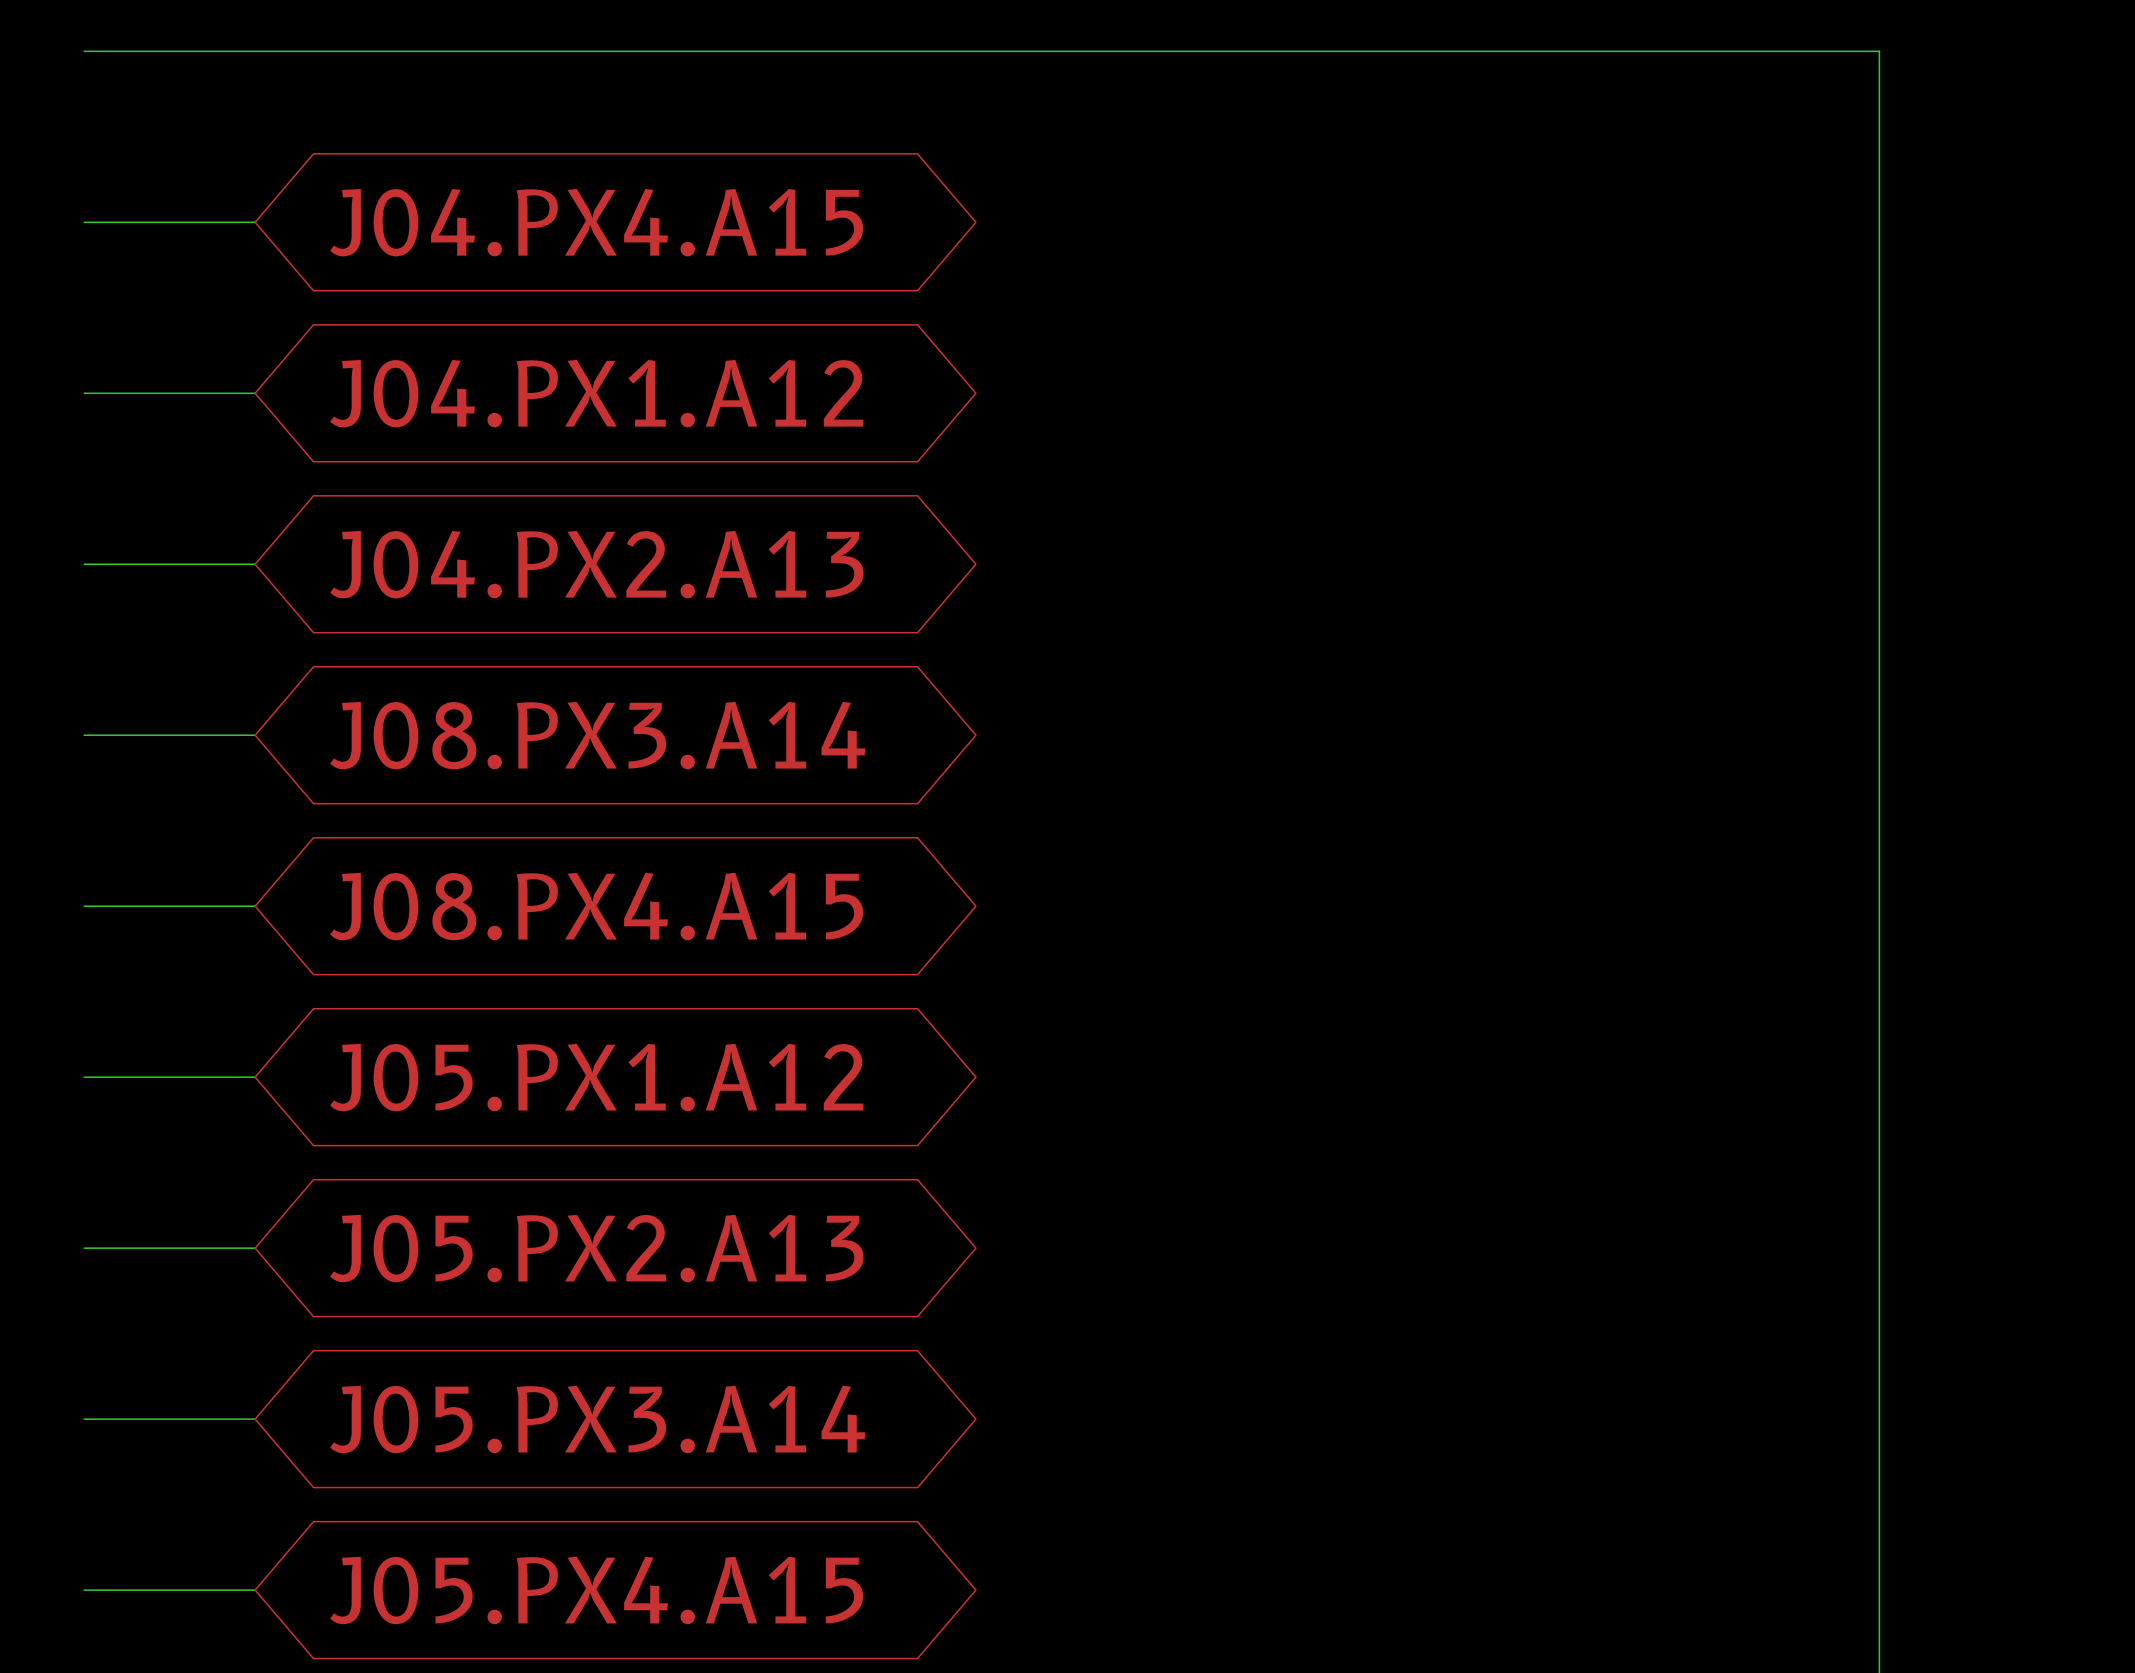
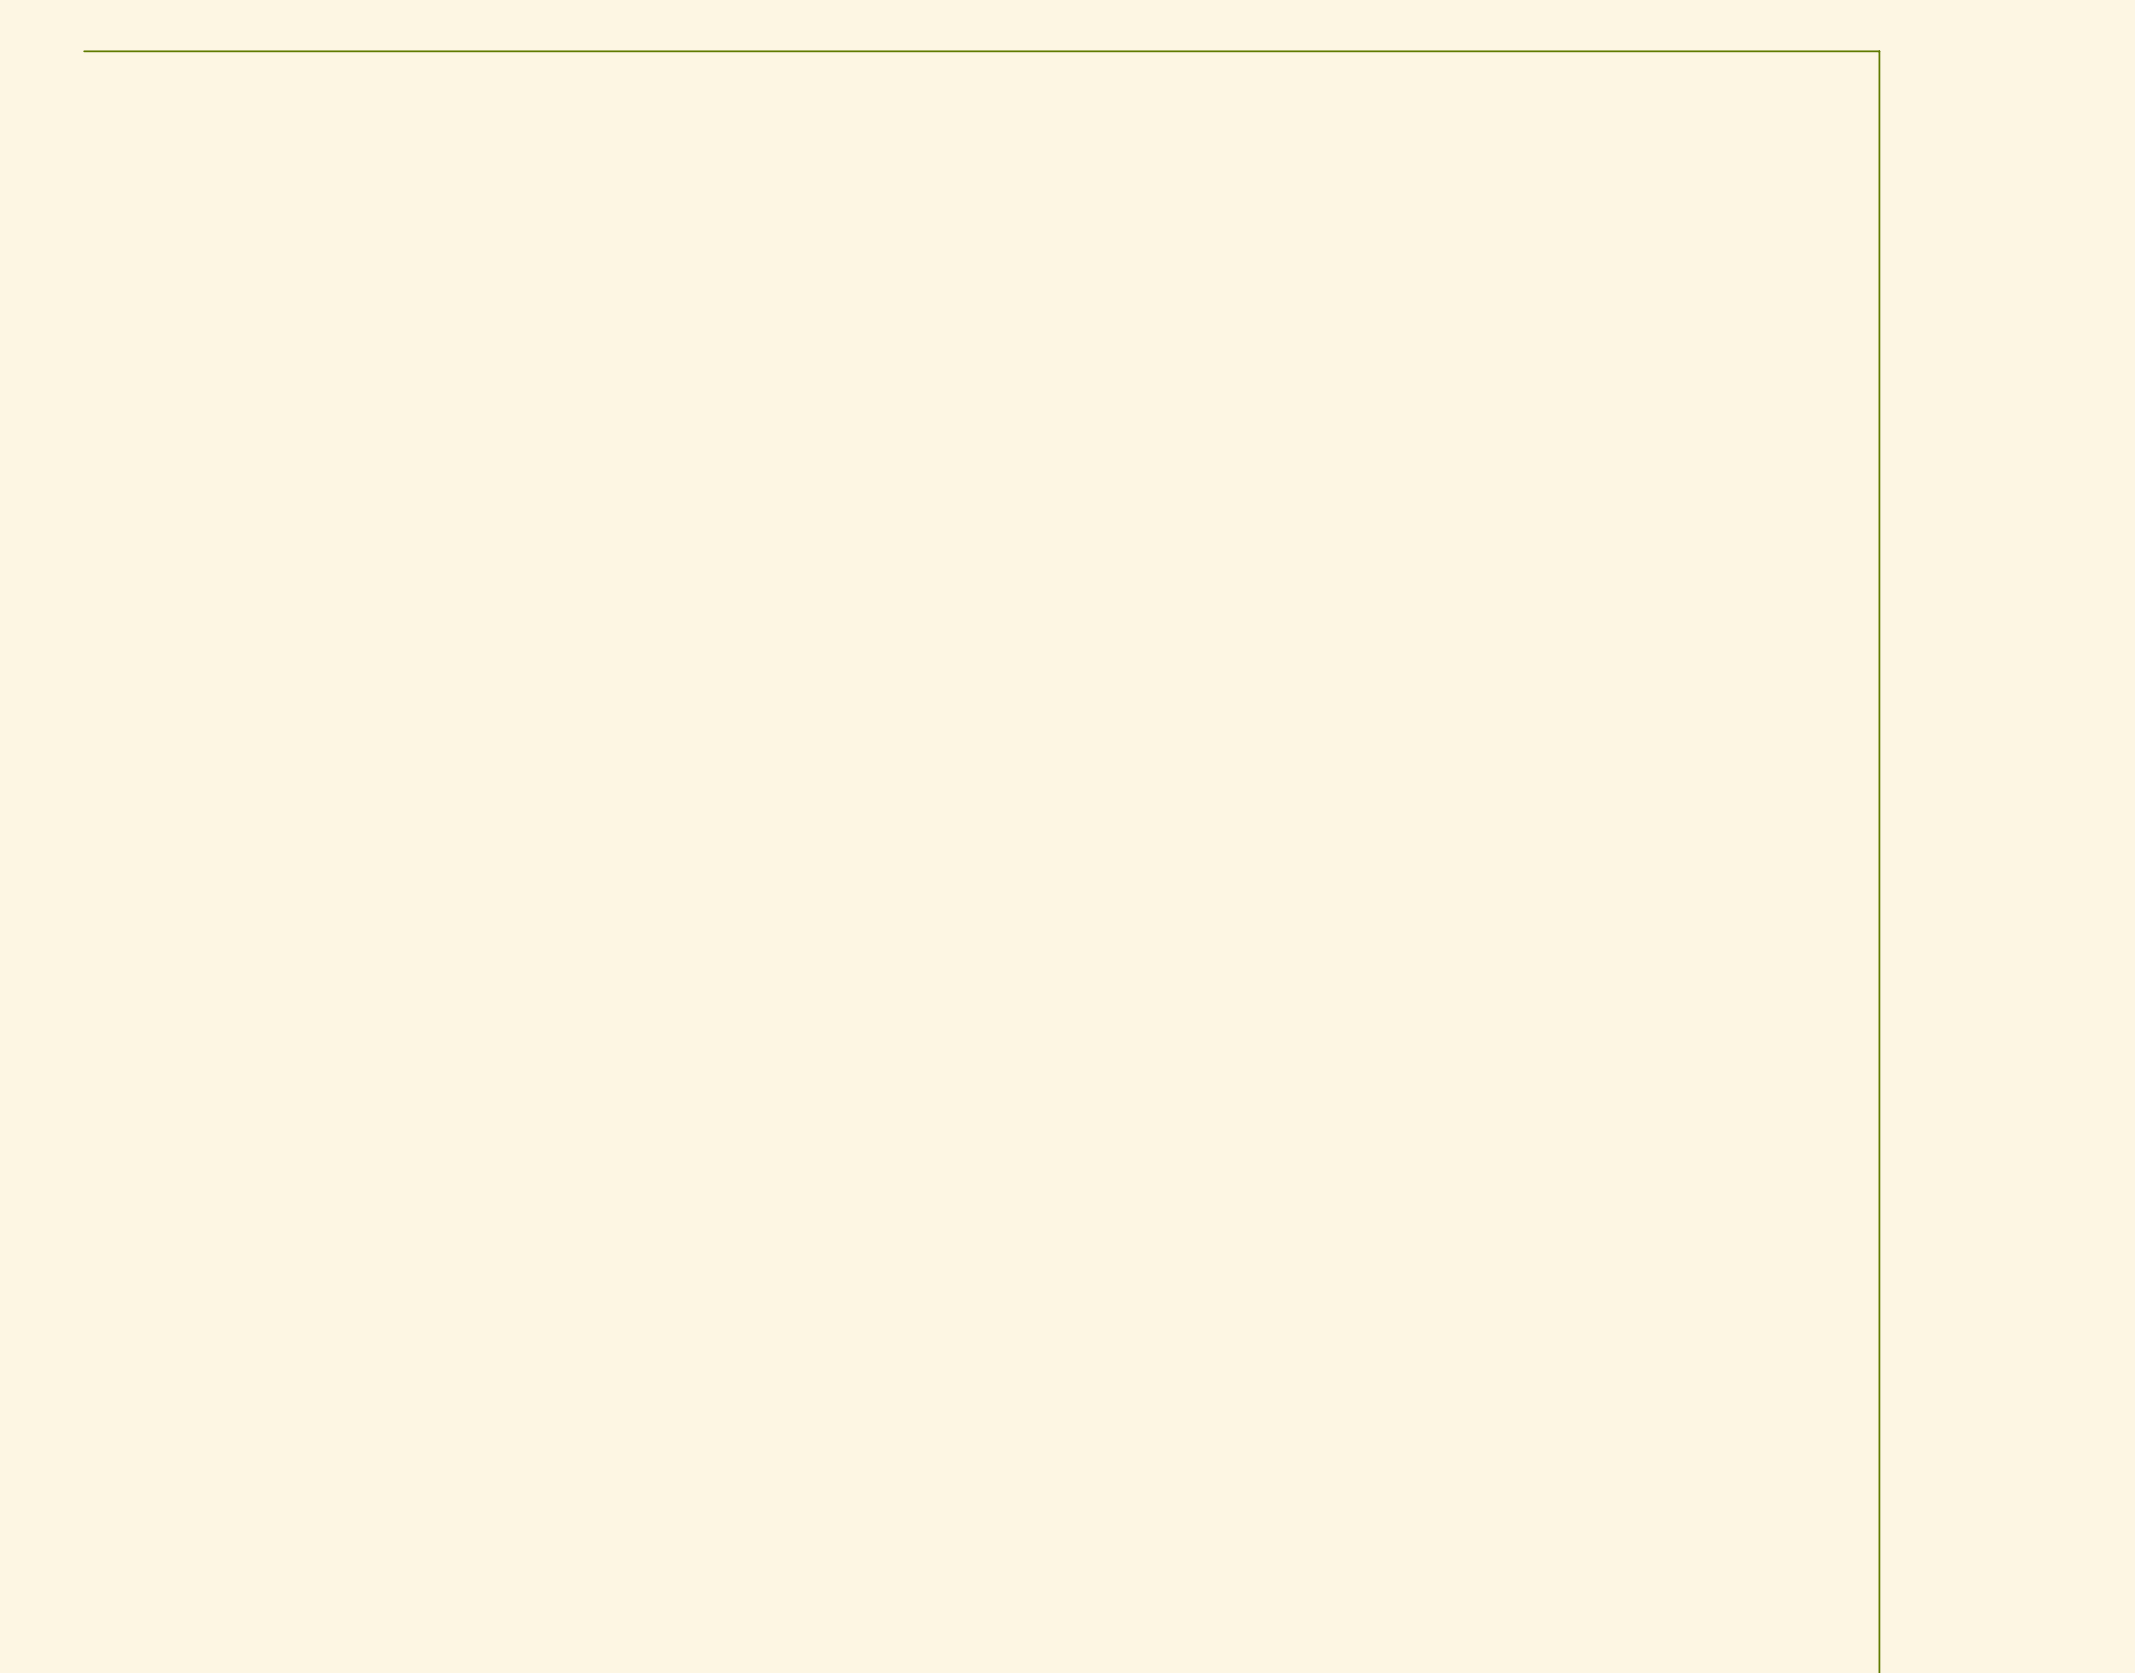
wire: (84, 222) (255, 222) -> none
global label: J04.PX4.A15 (596, 222) -> none
wire: (84, 393) (255, 393) -> none
global label: J04.PX1.A12 (596, 393) -> none
wire: (84, 564) (255, 564) -> none
global label: J04.PX2.A13 (596, 564) -> none
wire: (84, 735) (255, 735) -> none
global label: J08.PX3.A14 (597, 735) -> none
wire: (84, 906) (255, 906) -> none
global label: J08.PX4.A15 (596, 906) -> none
wire: (84, 1077) (255, 1077) -> none
global label: J05.PX1.A12 (596, 1077) -> none
wire: (84, 1248) (255, 1248) -> none
global label: J05.PX2.A13 (596, 1248) -> none
wire: (84, 1419) (255, 1419) -> none
global label: J05.PX3.A14 (597, 1419) -> none
wire: (84, 1590) (255, 1590) -> none
global label: J05.PX4.A15 (596, 1590) -> none

